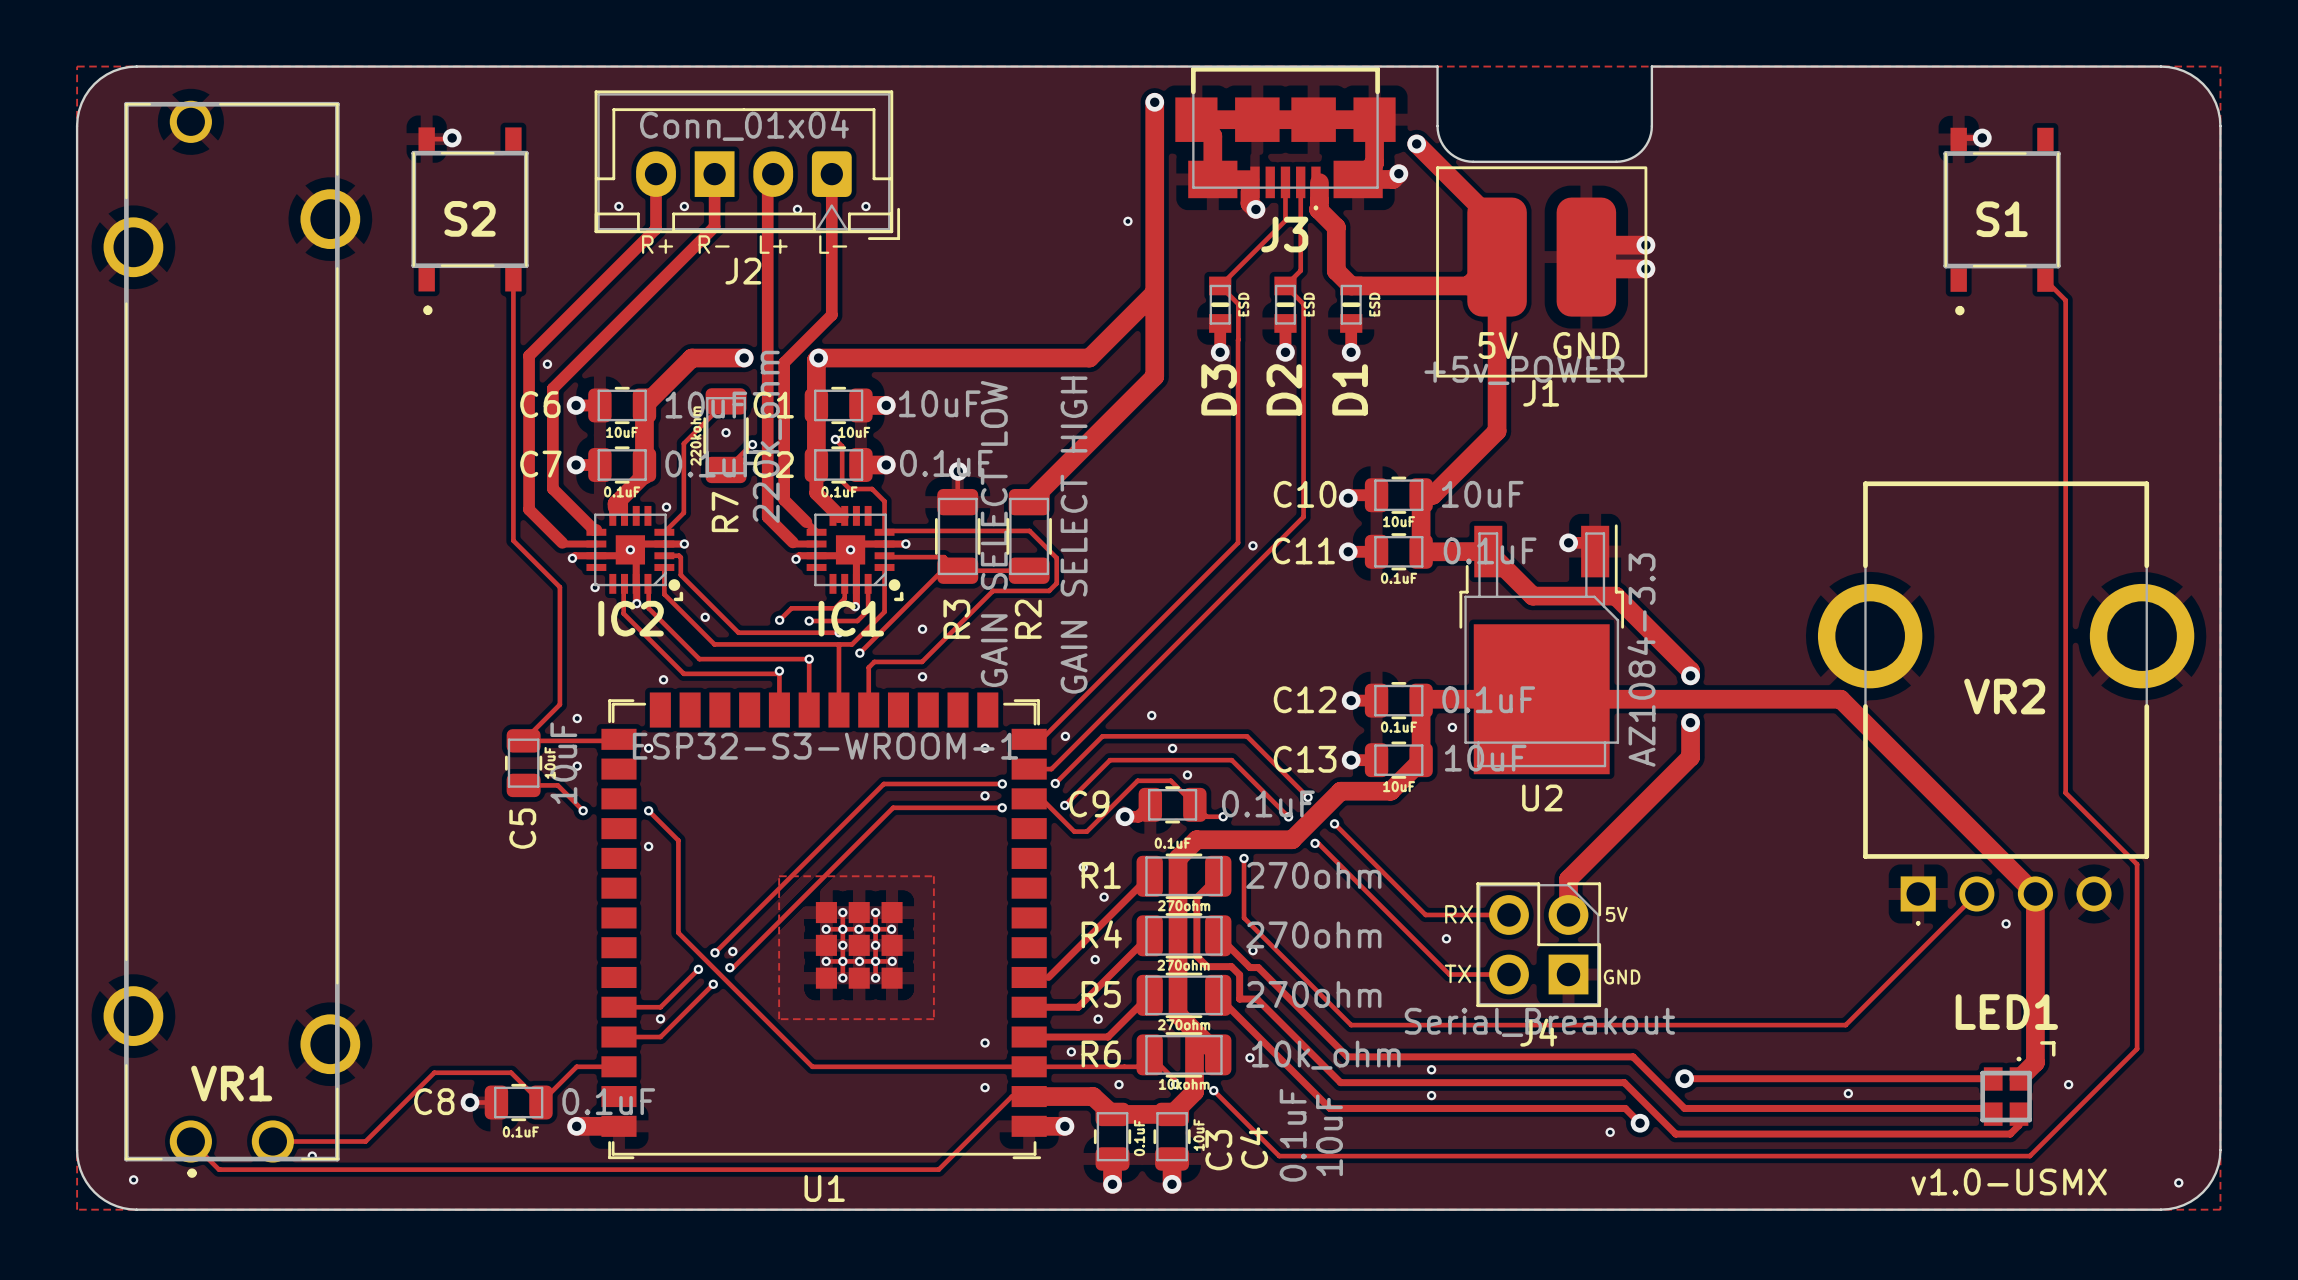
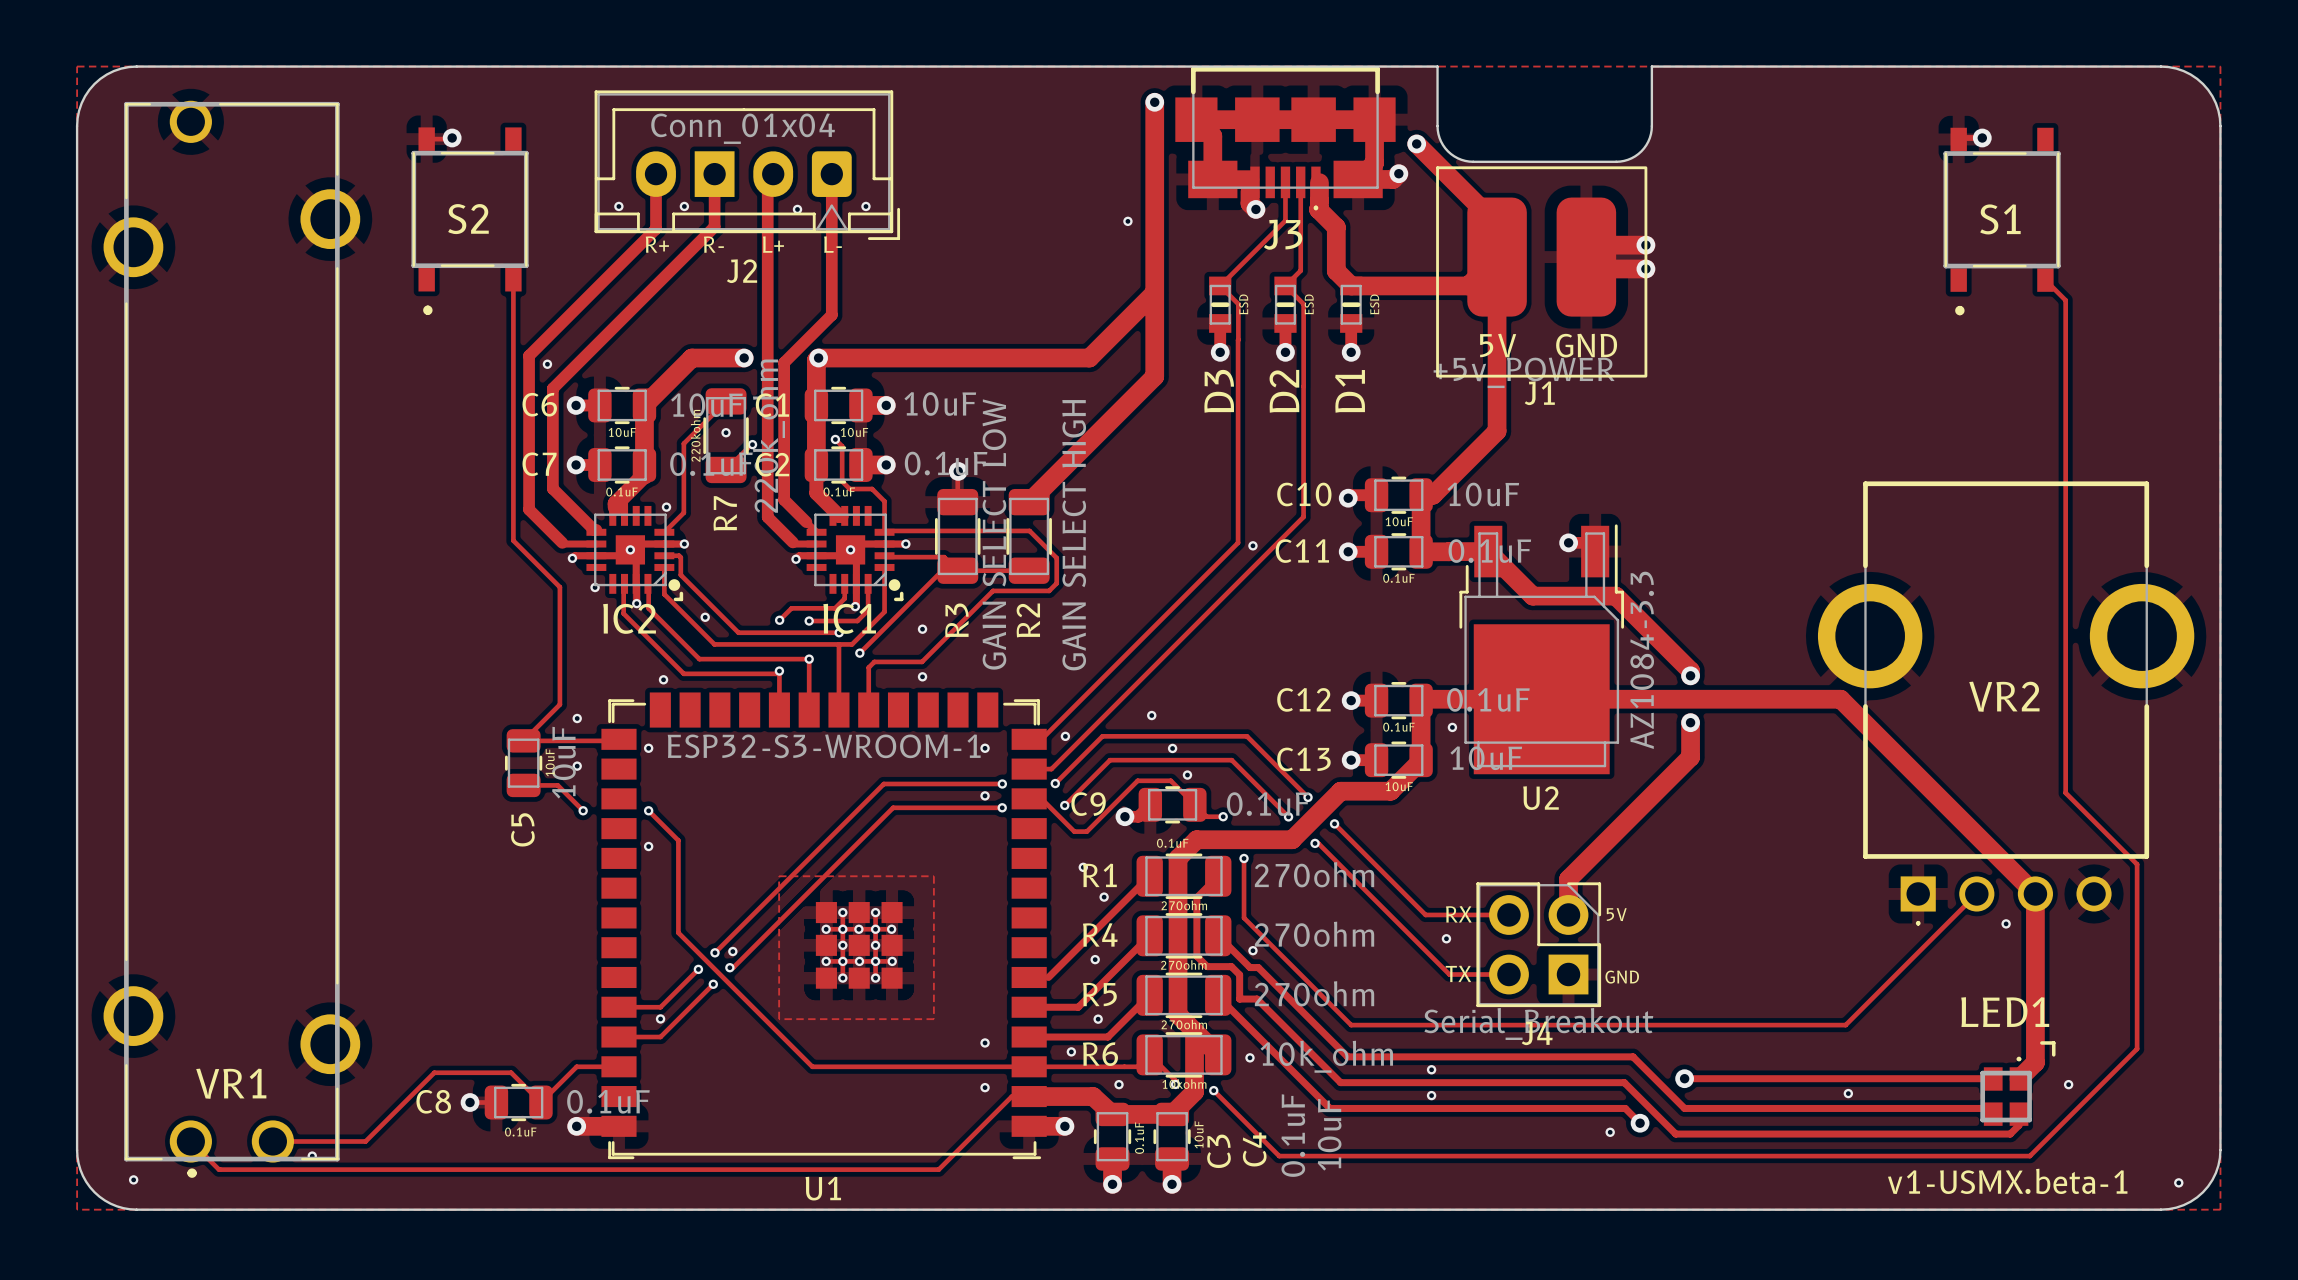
text: v1.0-USMX (2009, 1182) -> v1-USMX.beta-1 (2007, 1181)

